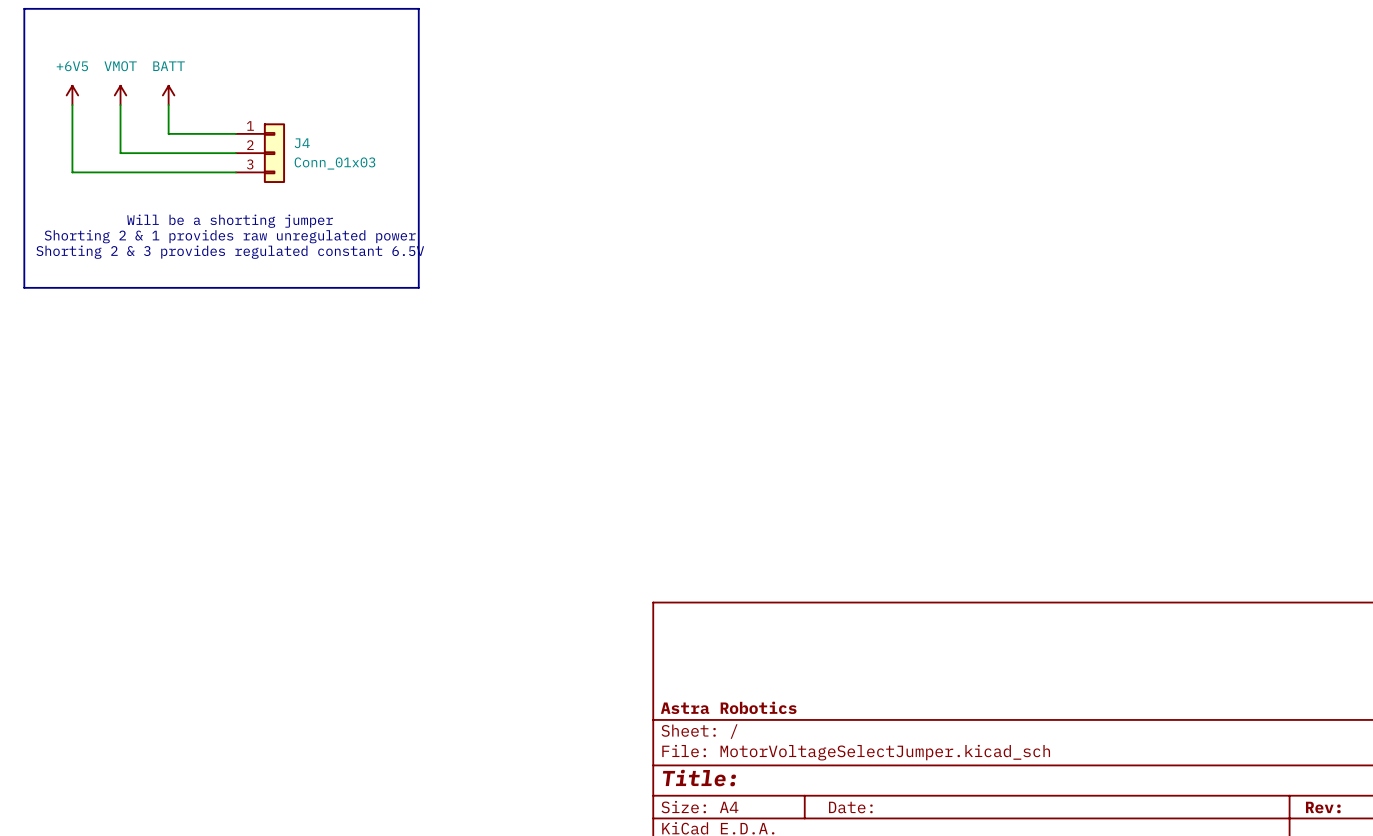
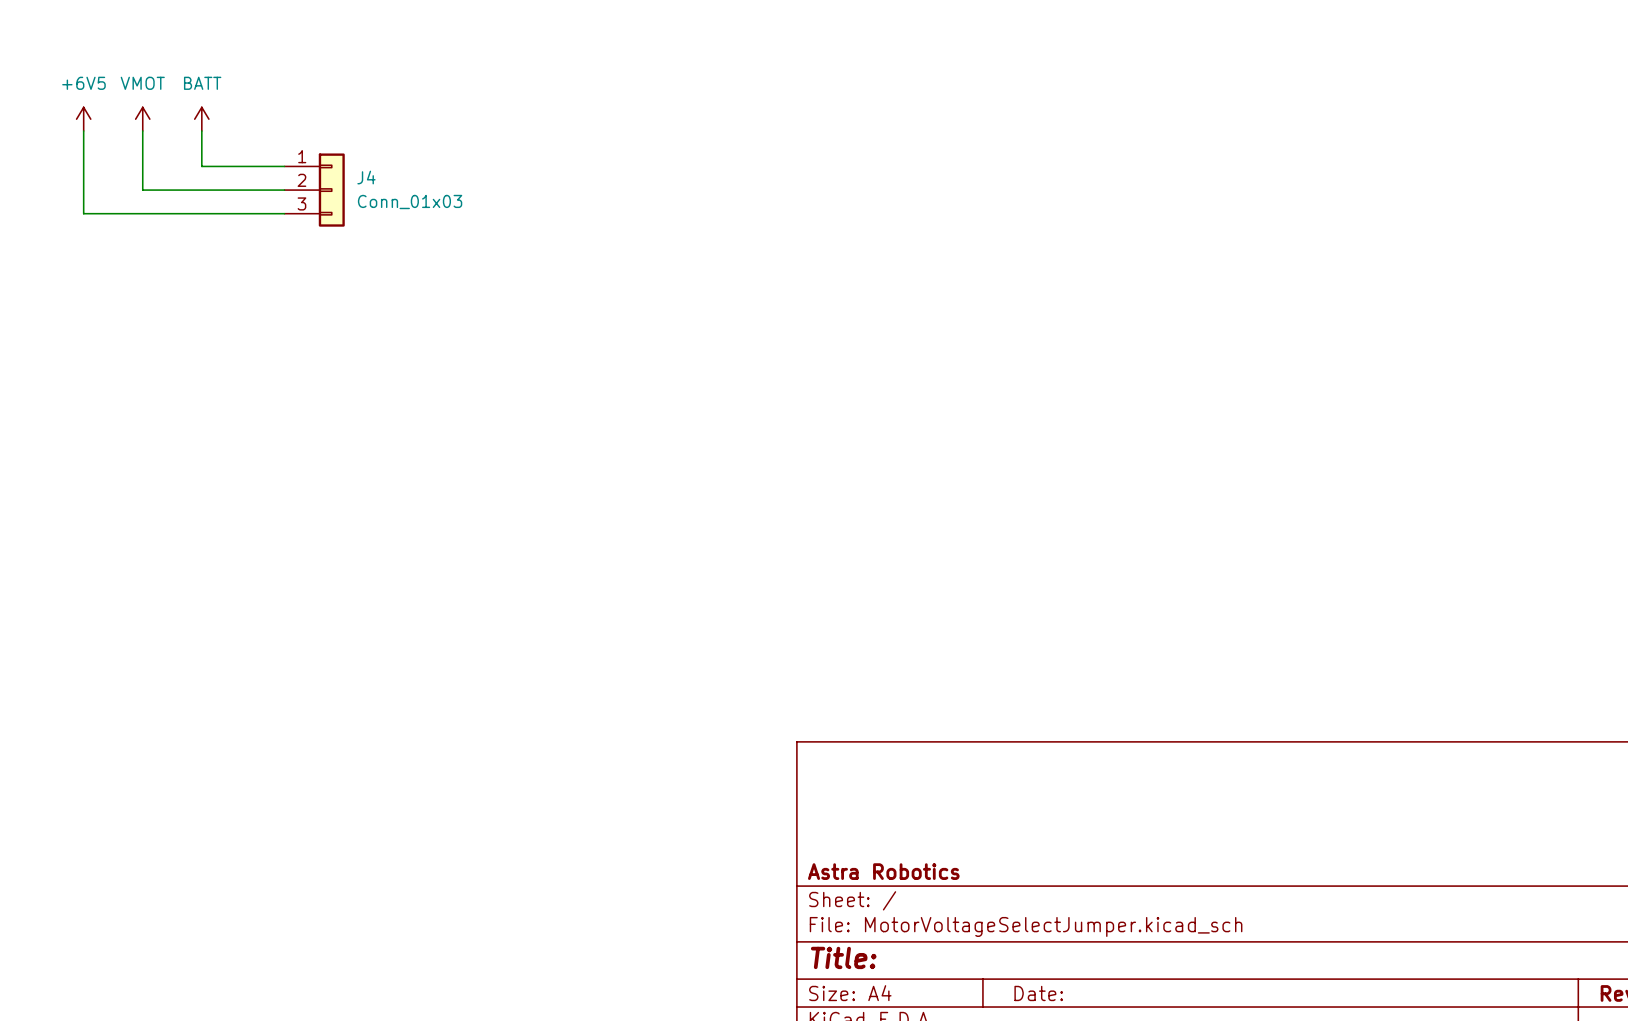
line: (24, 8) (418, 8) (418, 287) (24, 287) (24, 8) -> none
text: Will be a shorting jumper (230, 221) -> none
text: Shorting 2 & 1 provides raw unregulated power (230, 236) -> none
text: Shorting 2 & 3 provides regulated constant 6.5V (230, 252) -> none

